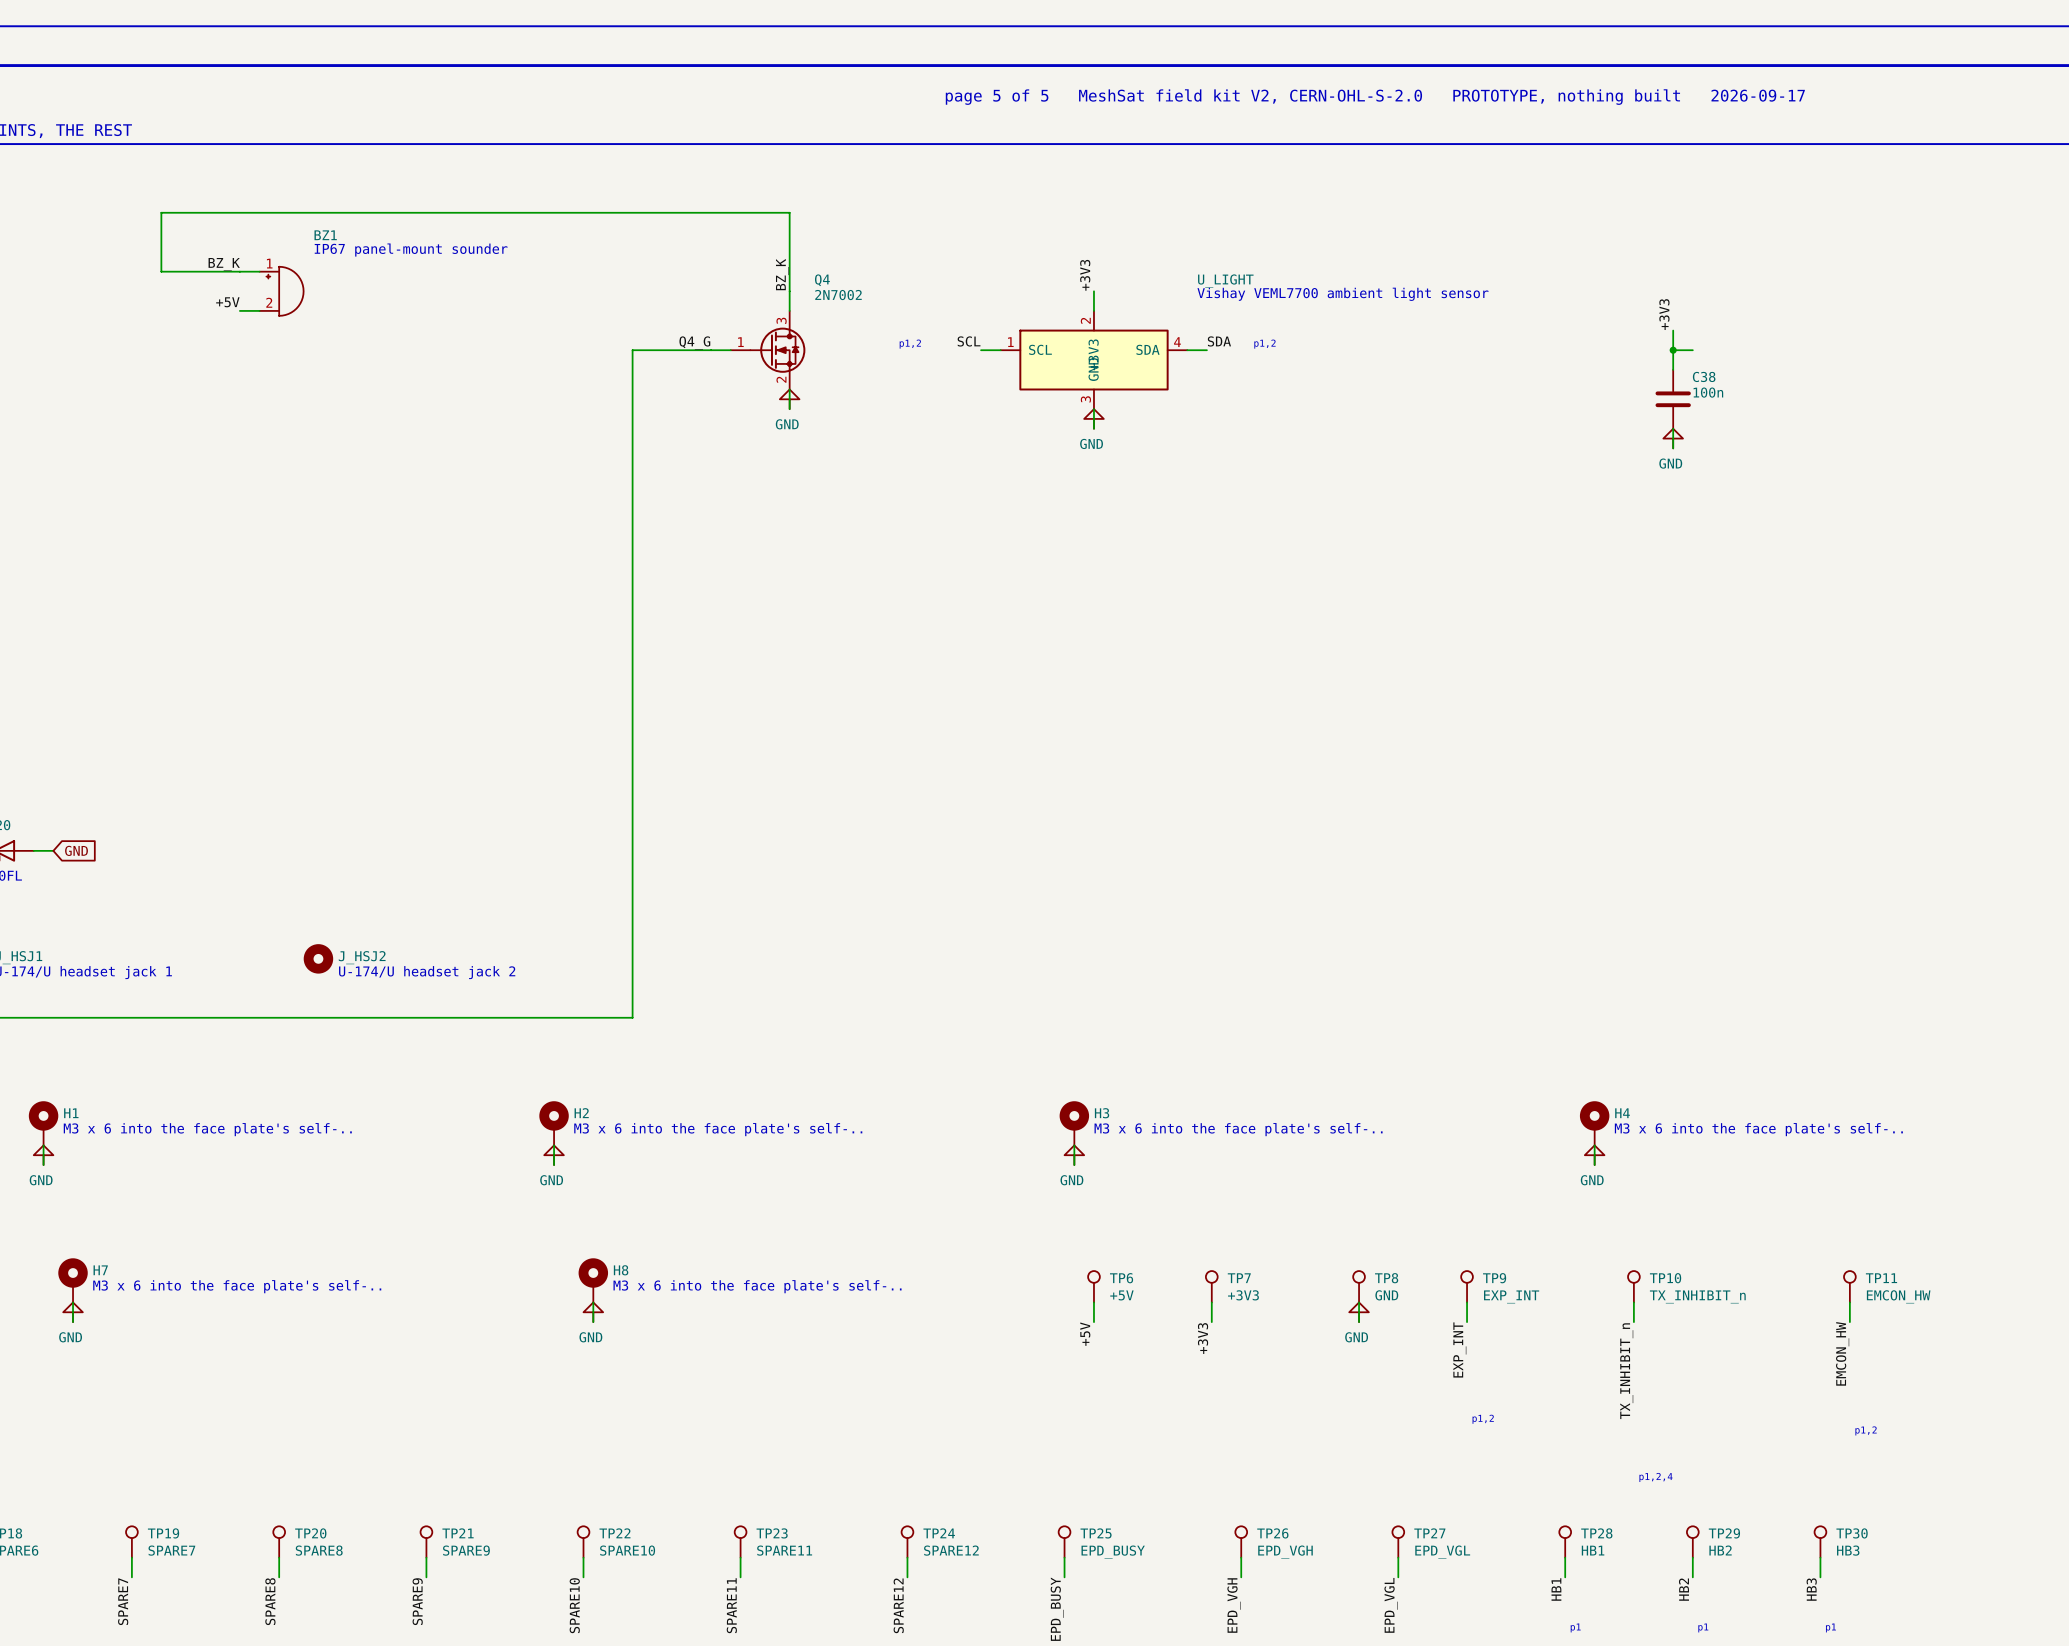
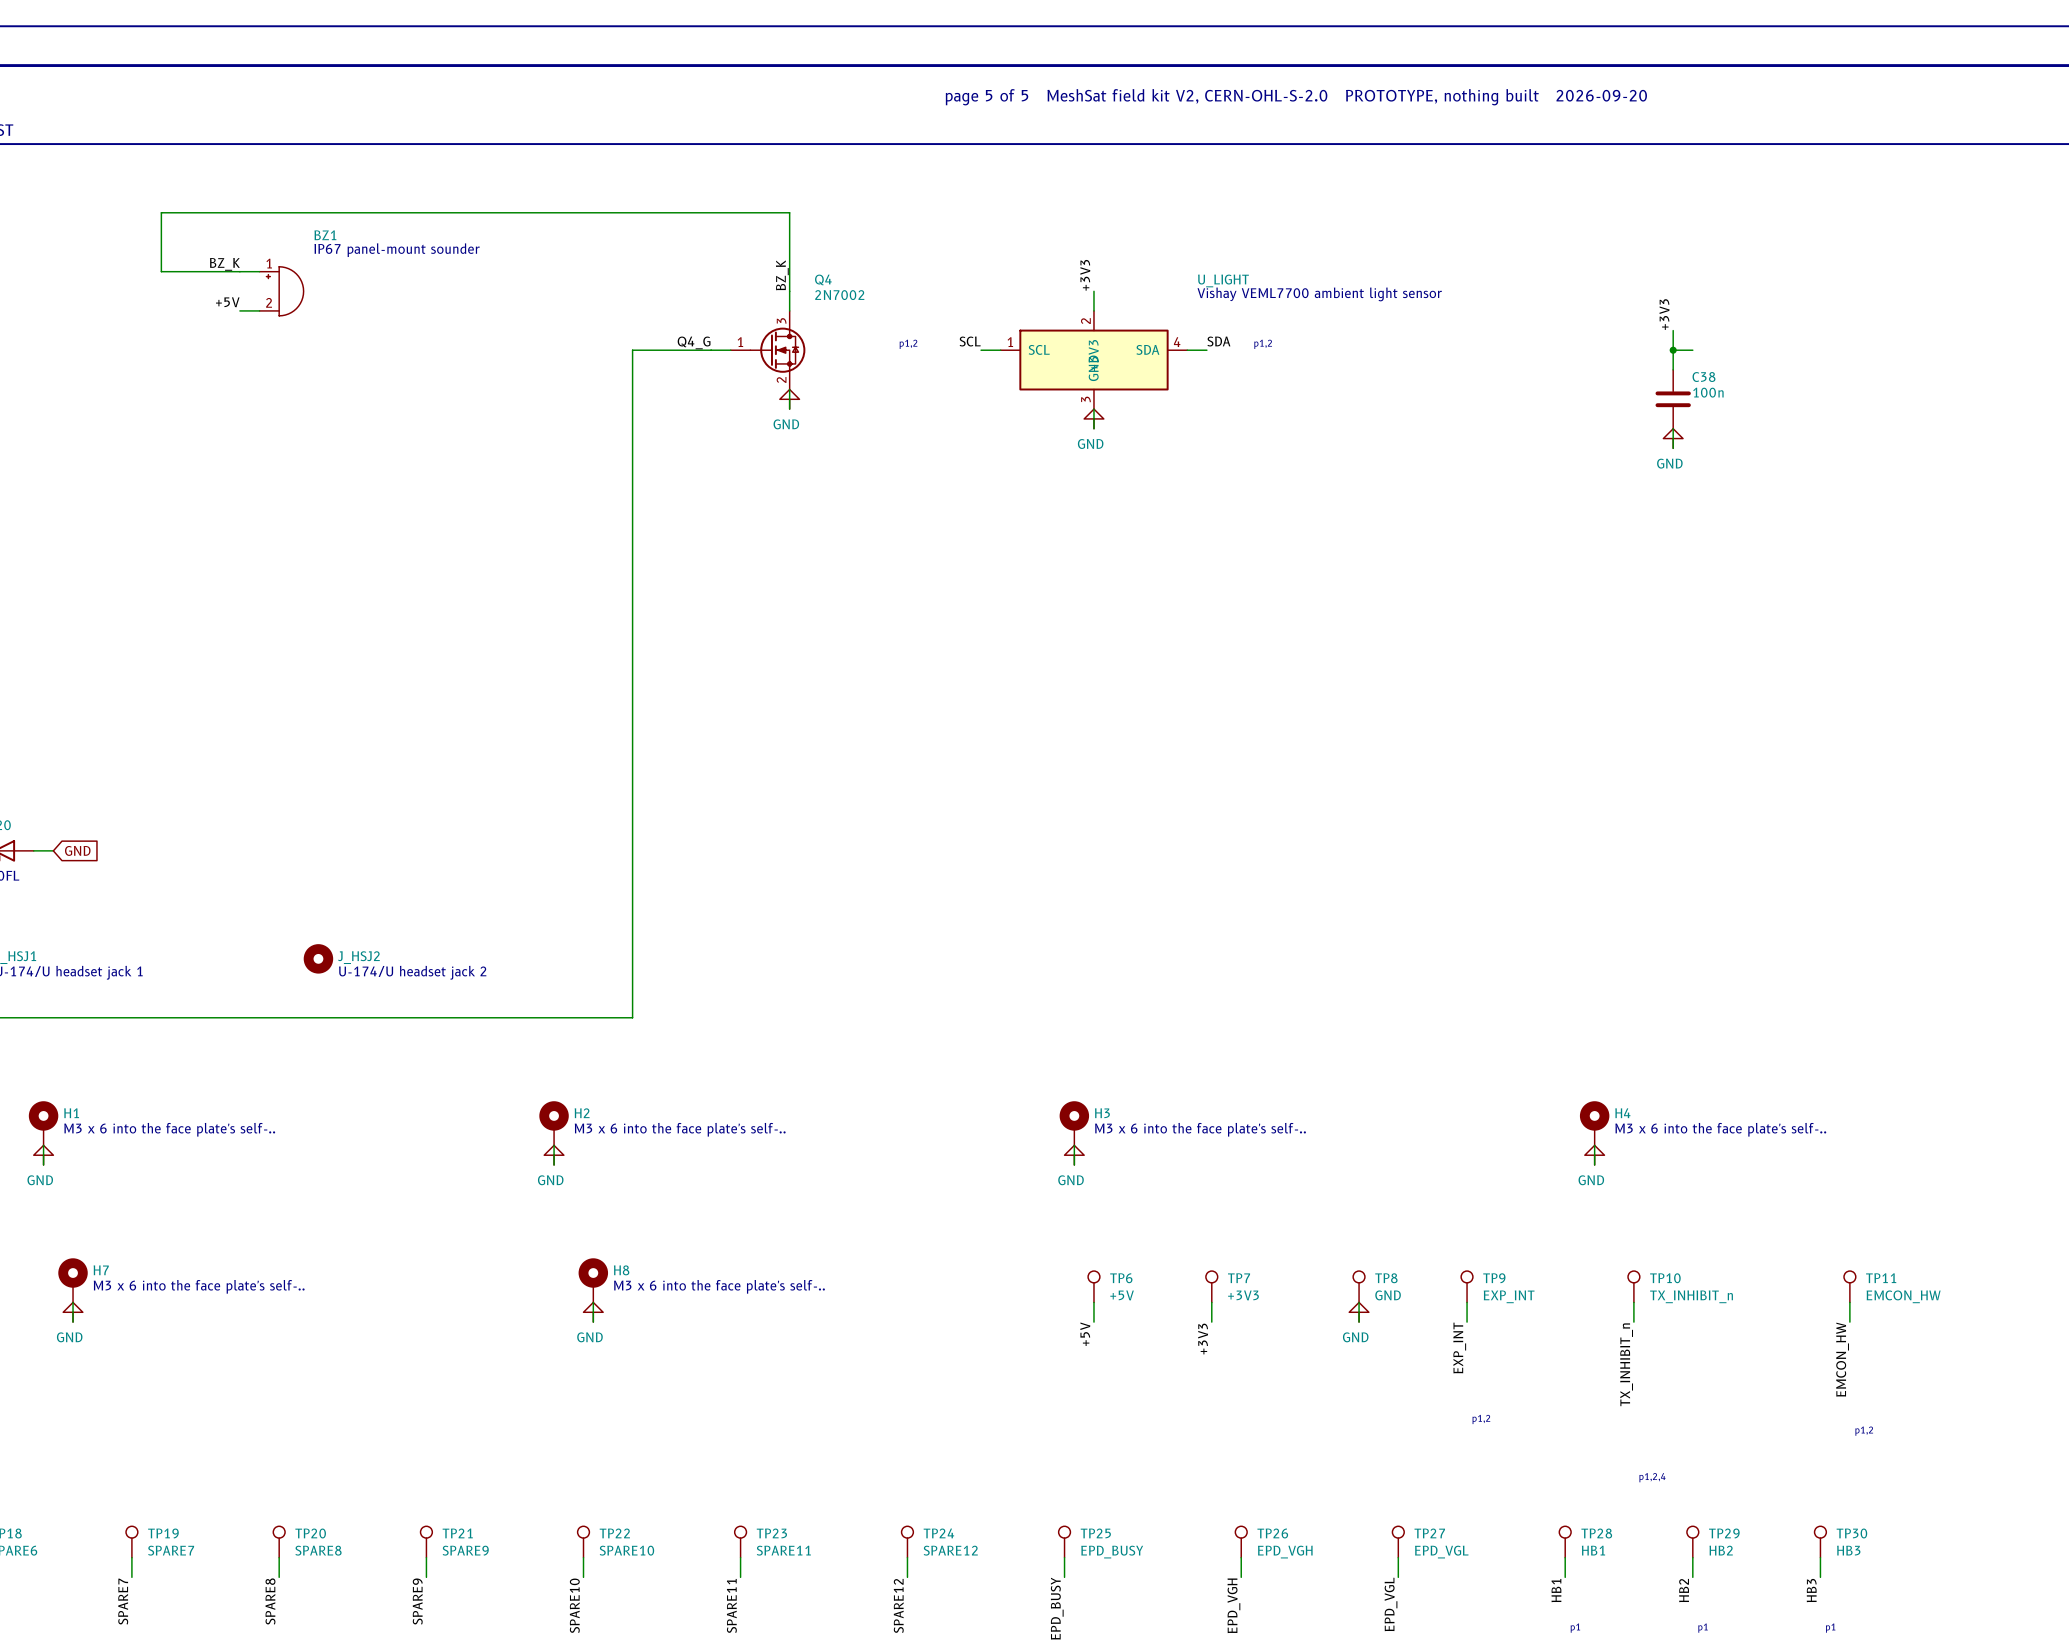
text: page 5 of 5 MeshSat field kit V2, CERN-OHL-S-2.0 PROTOTYPE, nothing built 2026-09-17 (1375, 97) -> page 5 of 5 MeshSat field kit V2, CERN-OHL-S-2.0 PROTOTYPE, nothing built 2026-09-20 (1296, 97)

